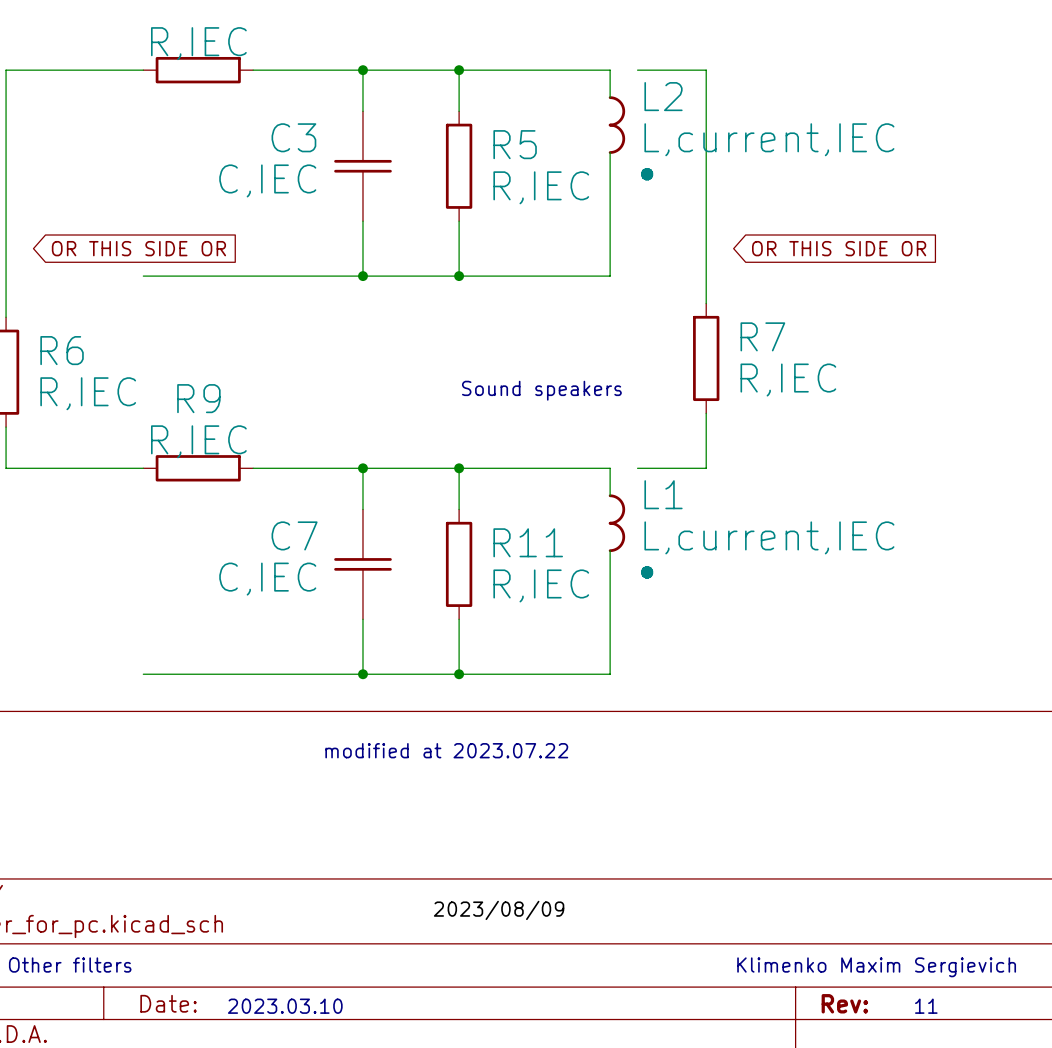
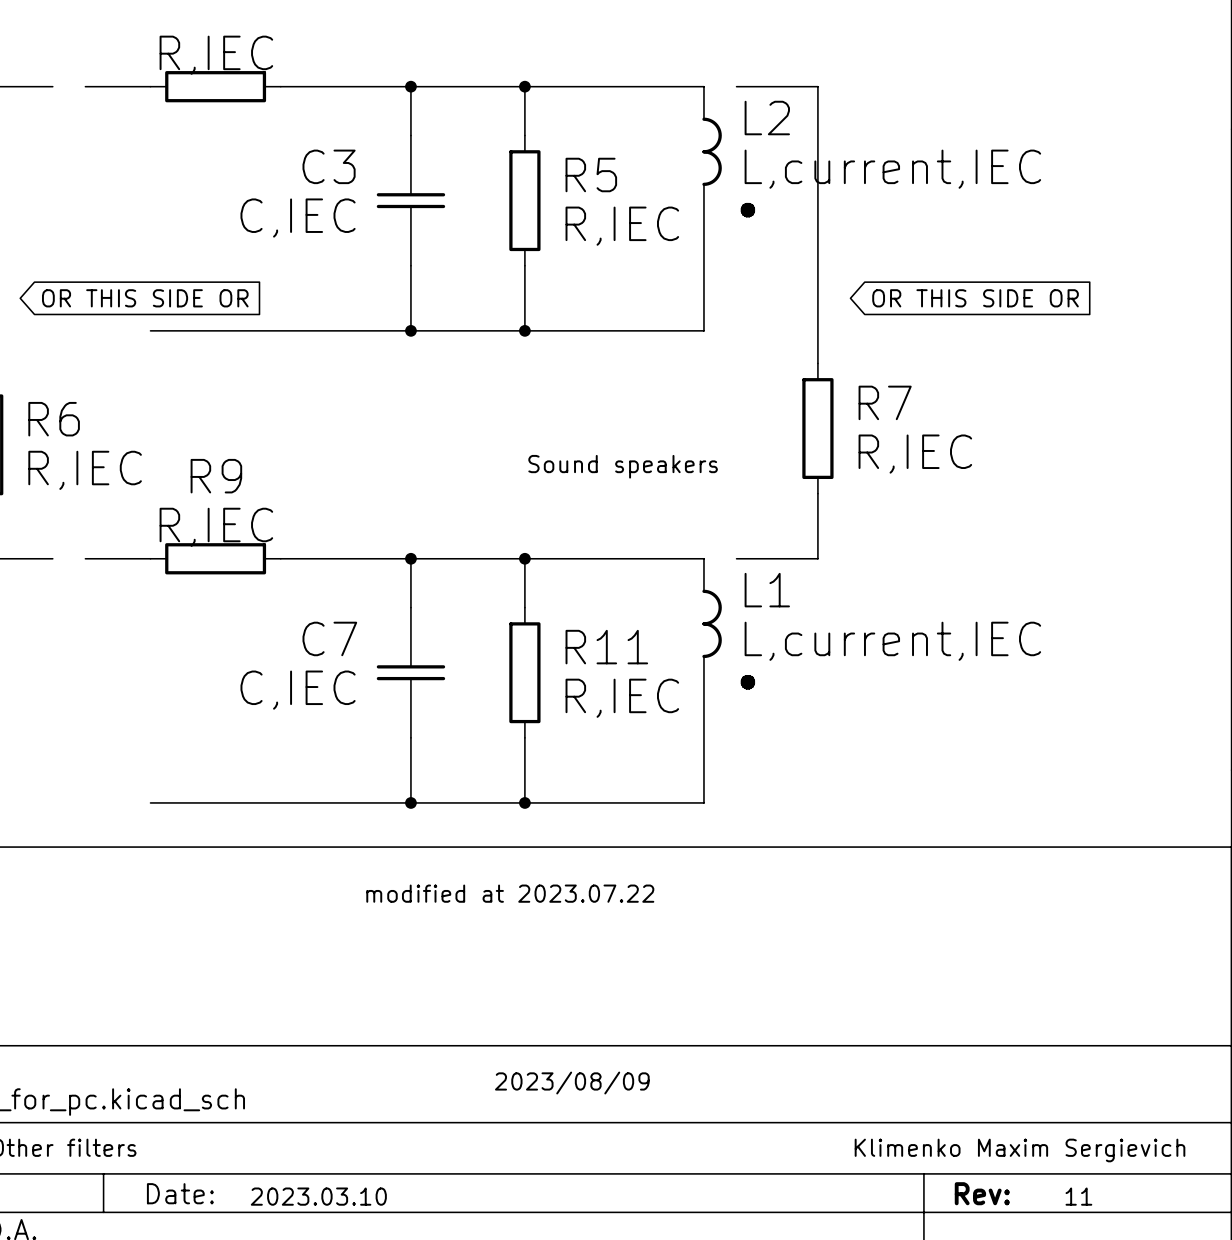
wire: (60, 70) (88, 70) -> none
wire: (60, 468) (88, 468) -> none

